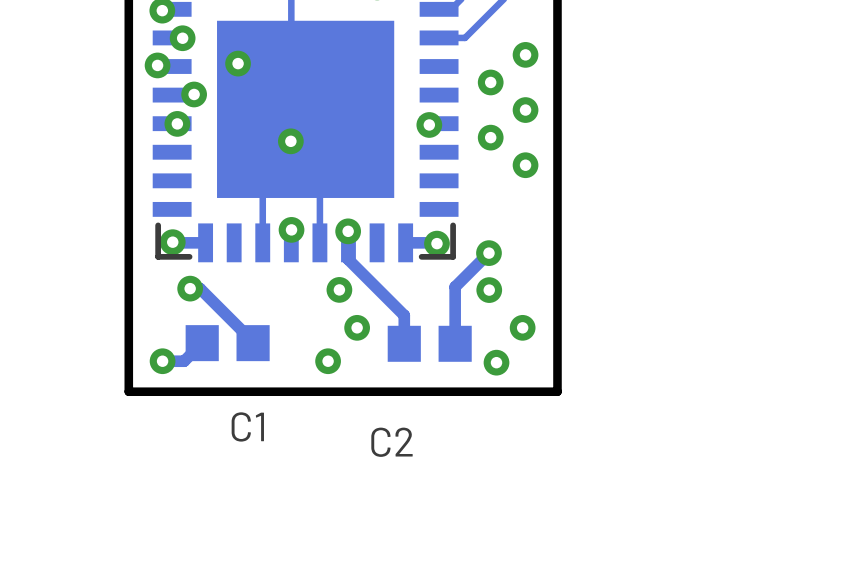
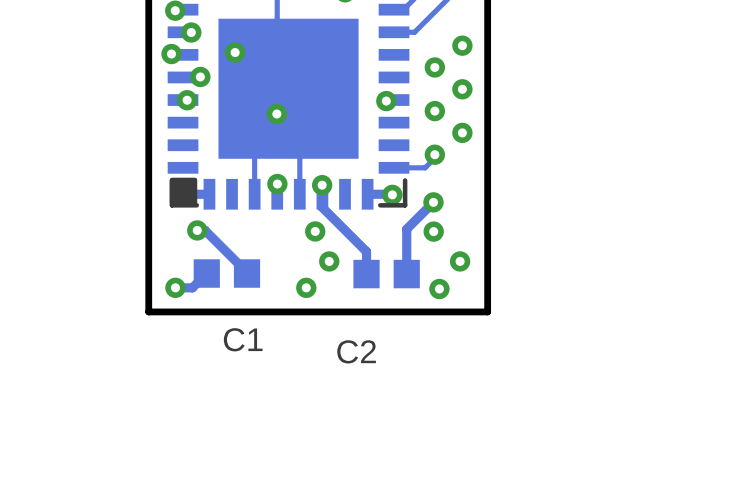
via: none -> (434, 154)
track: none -> (435, 157) (425, 167) (394, 167)
drawing: none -> [169, 177, 198, 206]

